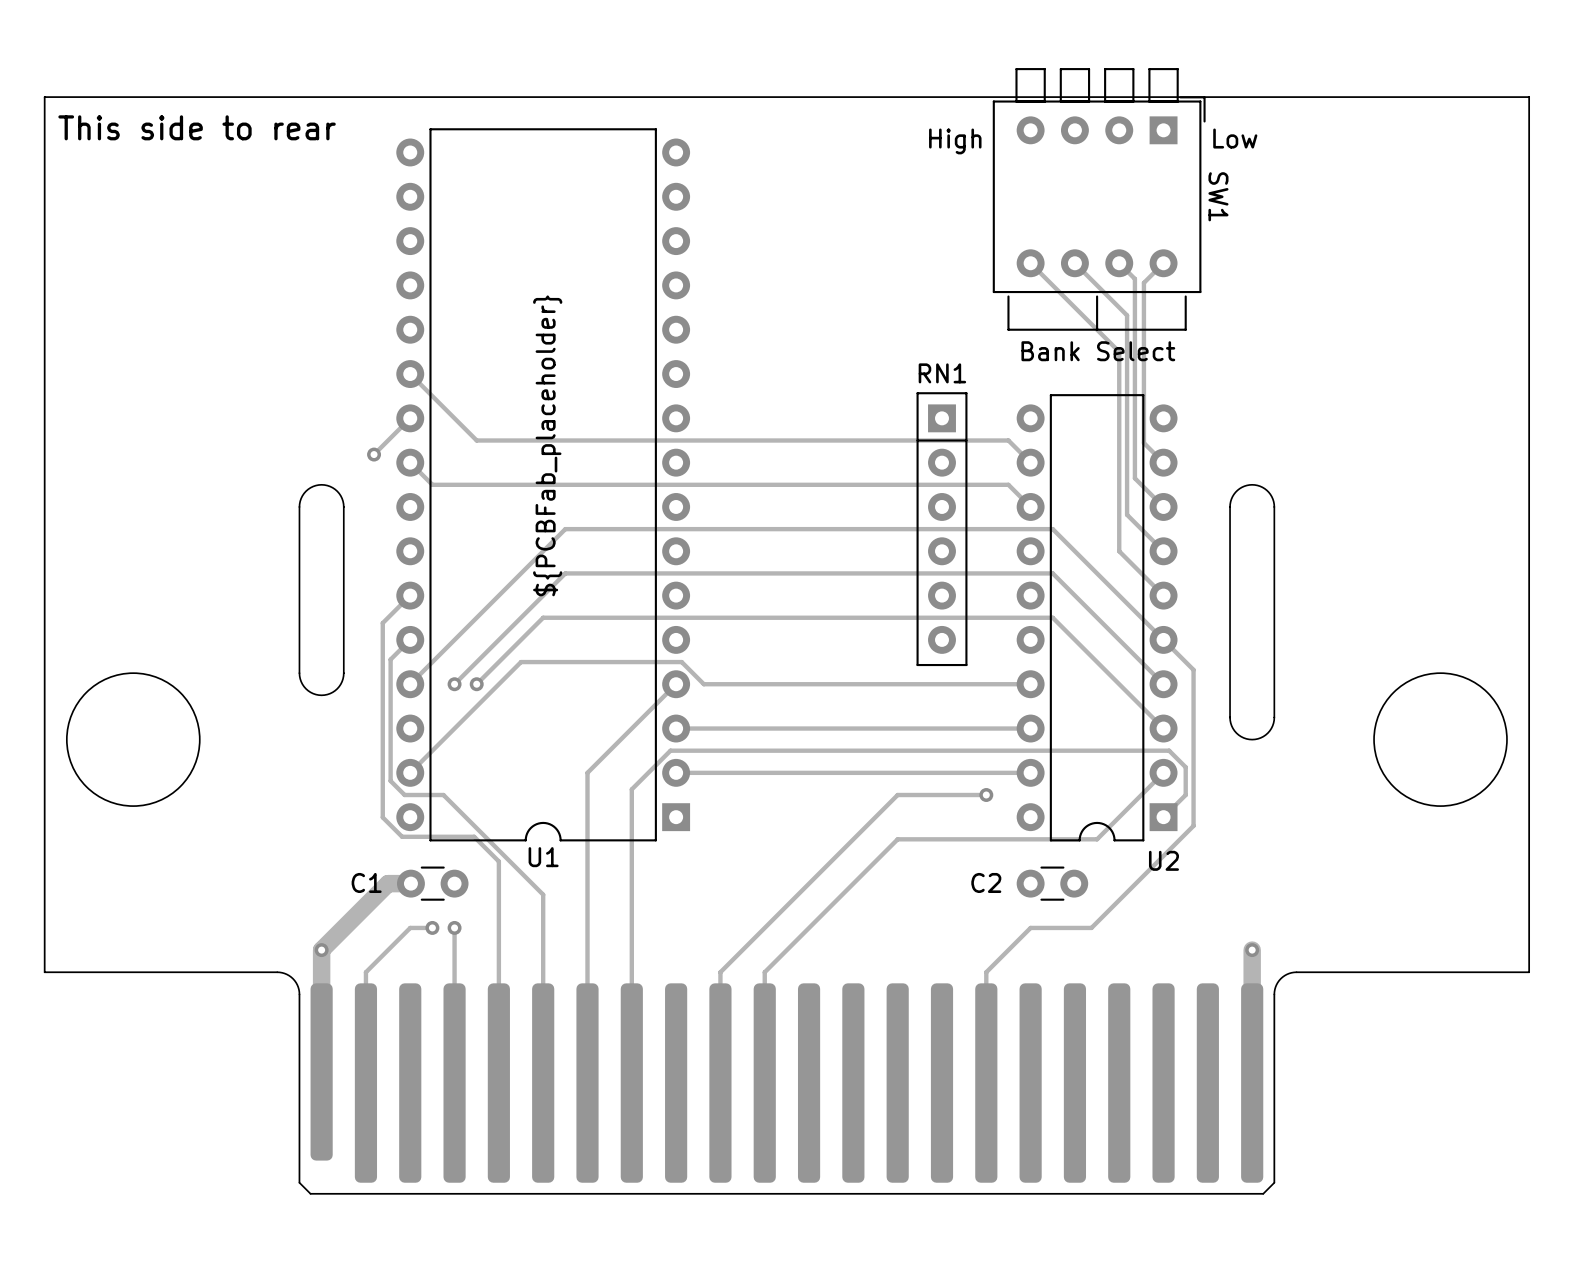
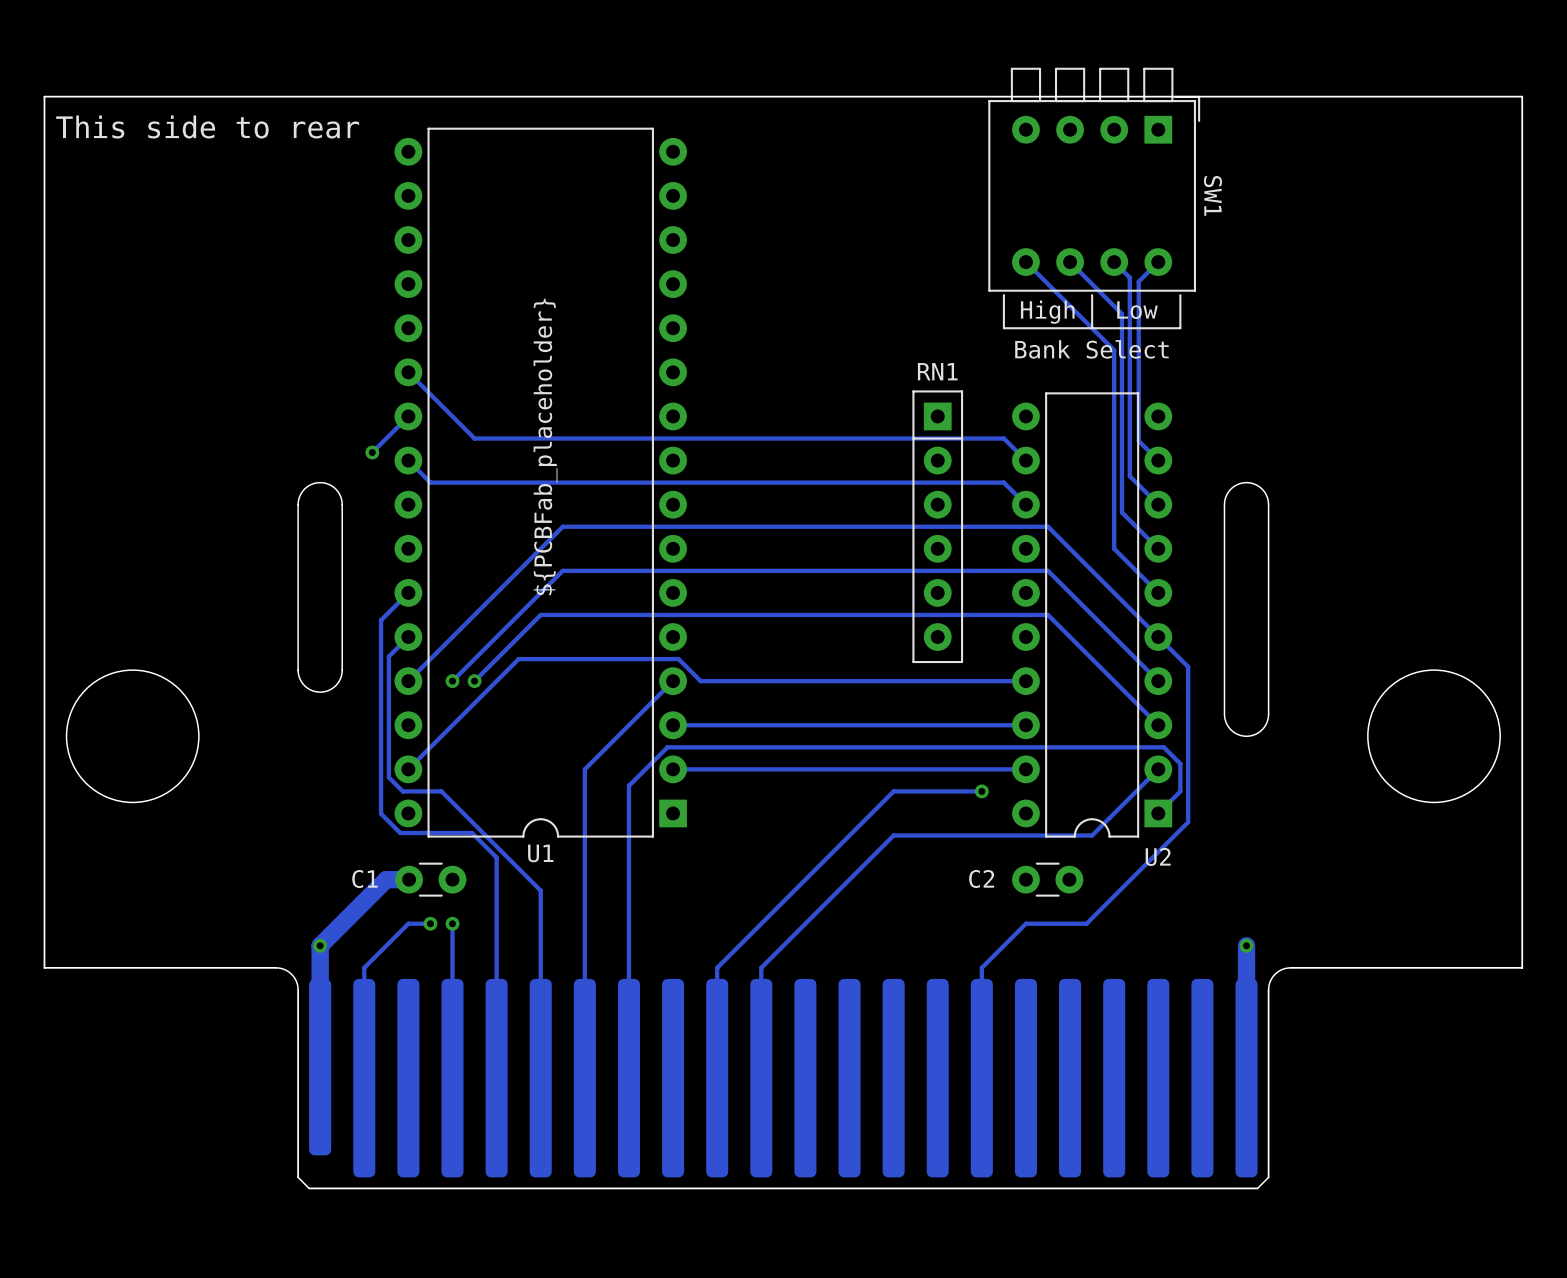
text position: Low (1235, 138) -> Low (1137, 310)
text position: High (955, 141) -> High (1047, 312)

